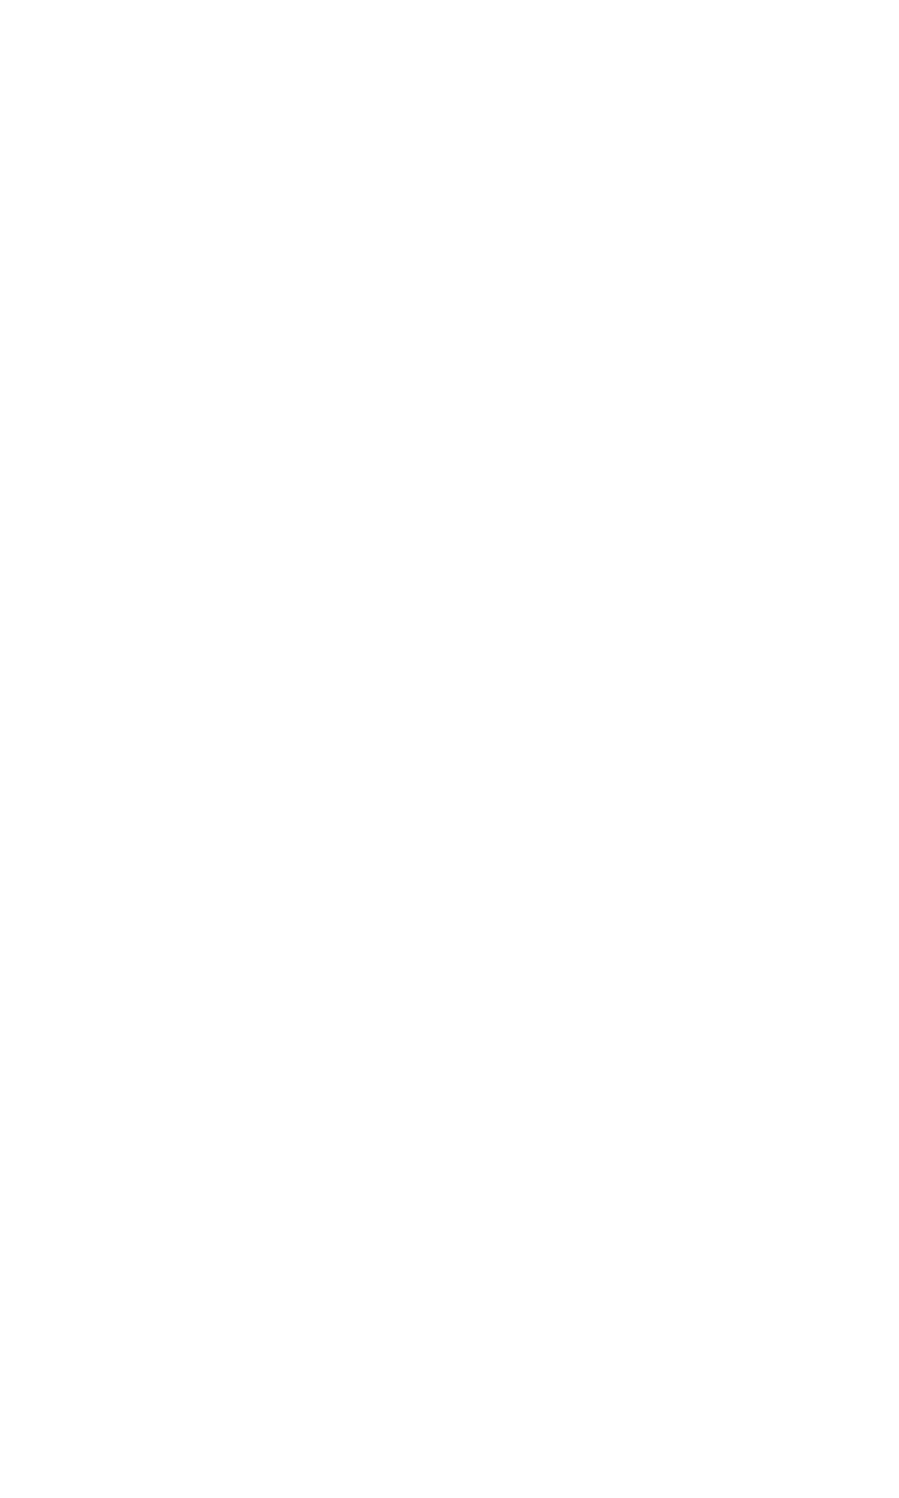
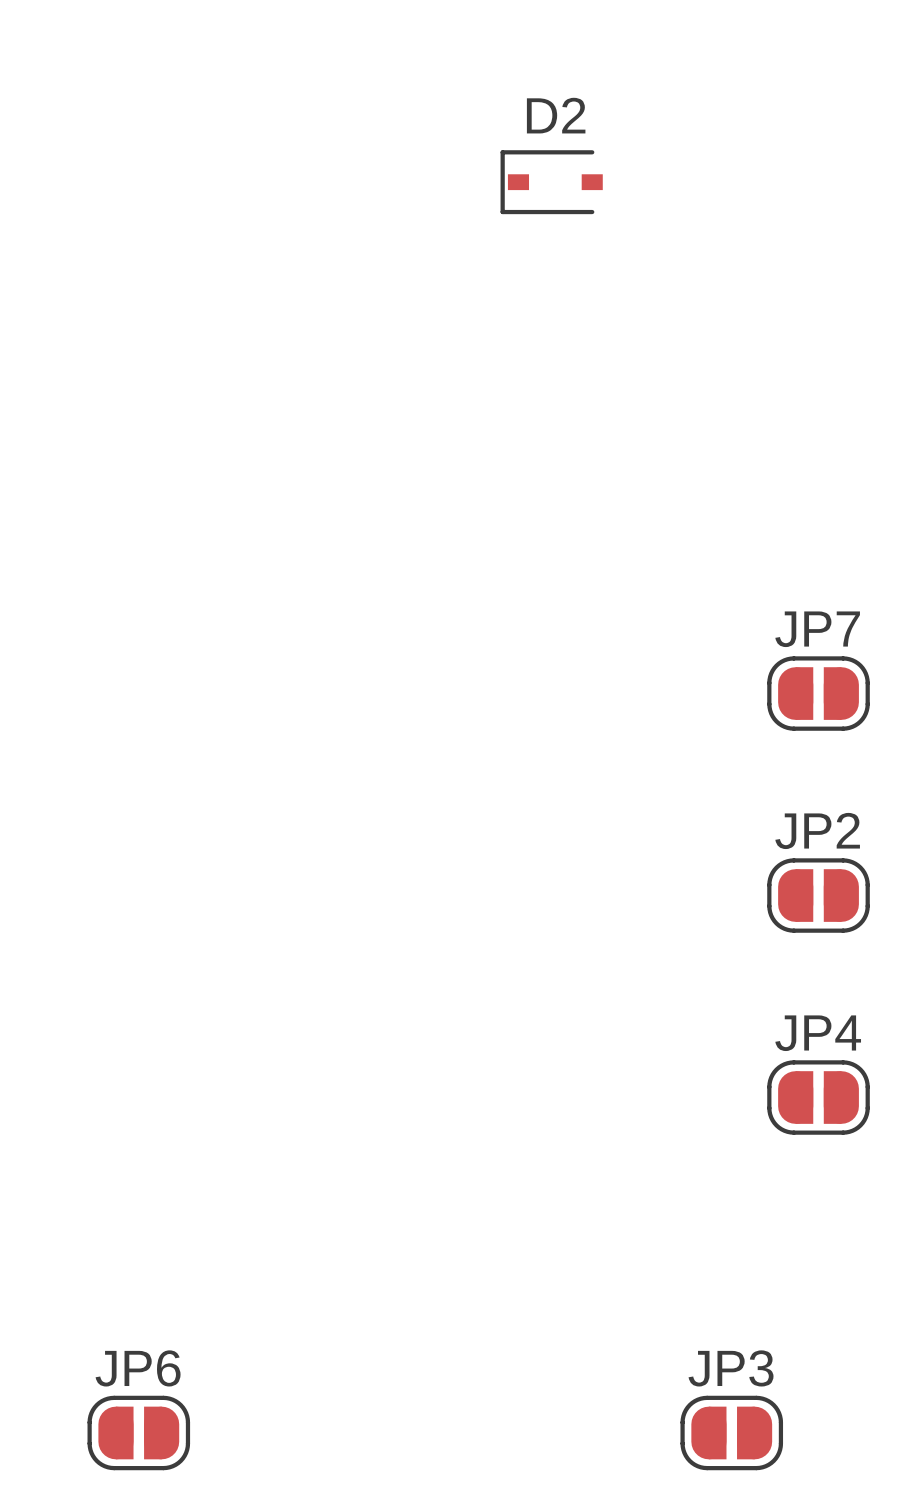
D2: none -> (551, 182)
JP7: none -> (818, 693)
JP2: none -> (818, 895)
JP4: none -> (818, 1097)
JP6: none -> (138, 1432)
JP3: none -> (731, 1432)

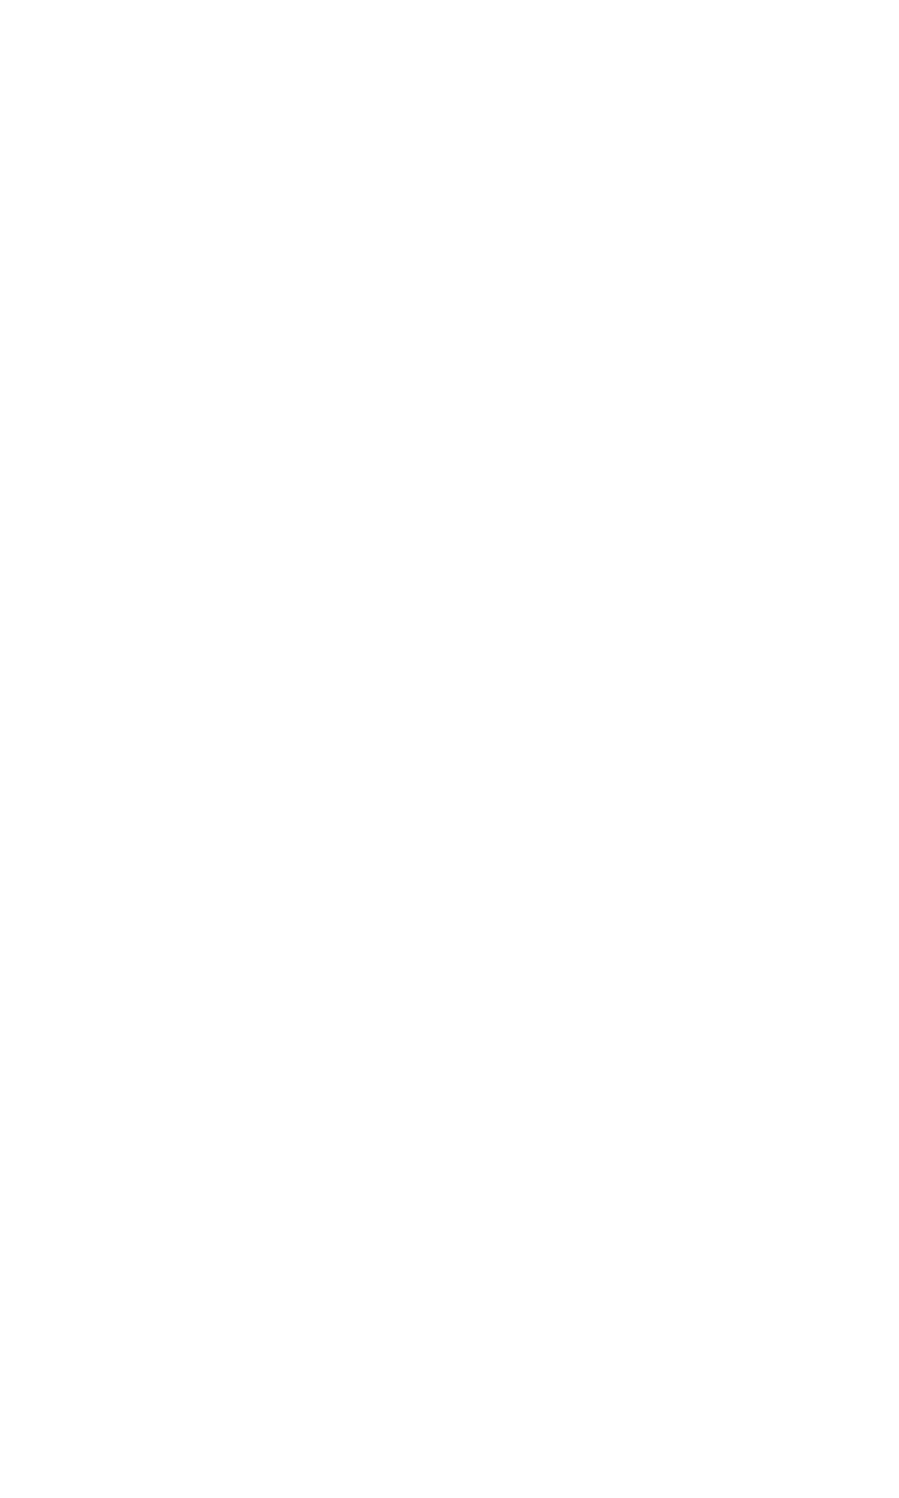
D2: (551, 182) -> none
JP7: (818, 693) -> none
JP2: (818, 895) -> none
JP4: (818, 1097) -> none
JP6: (138, 1432) -> none
JP3: (731, 1432) -> none

